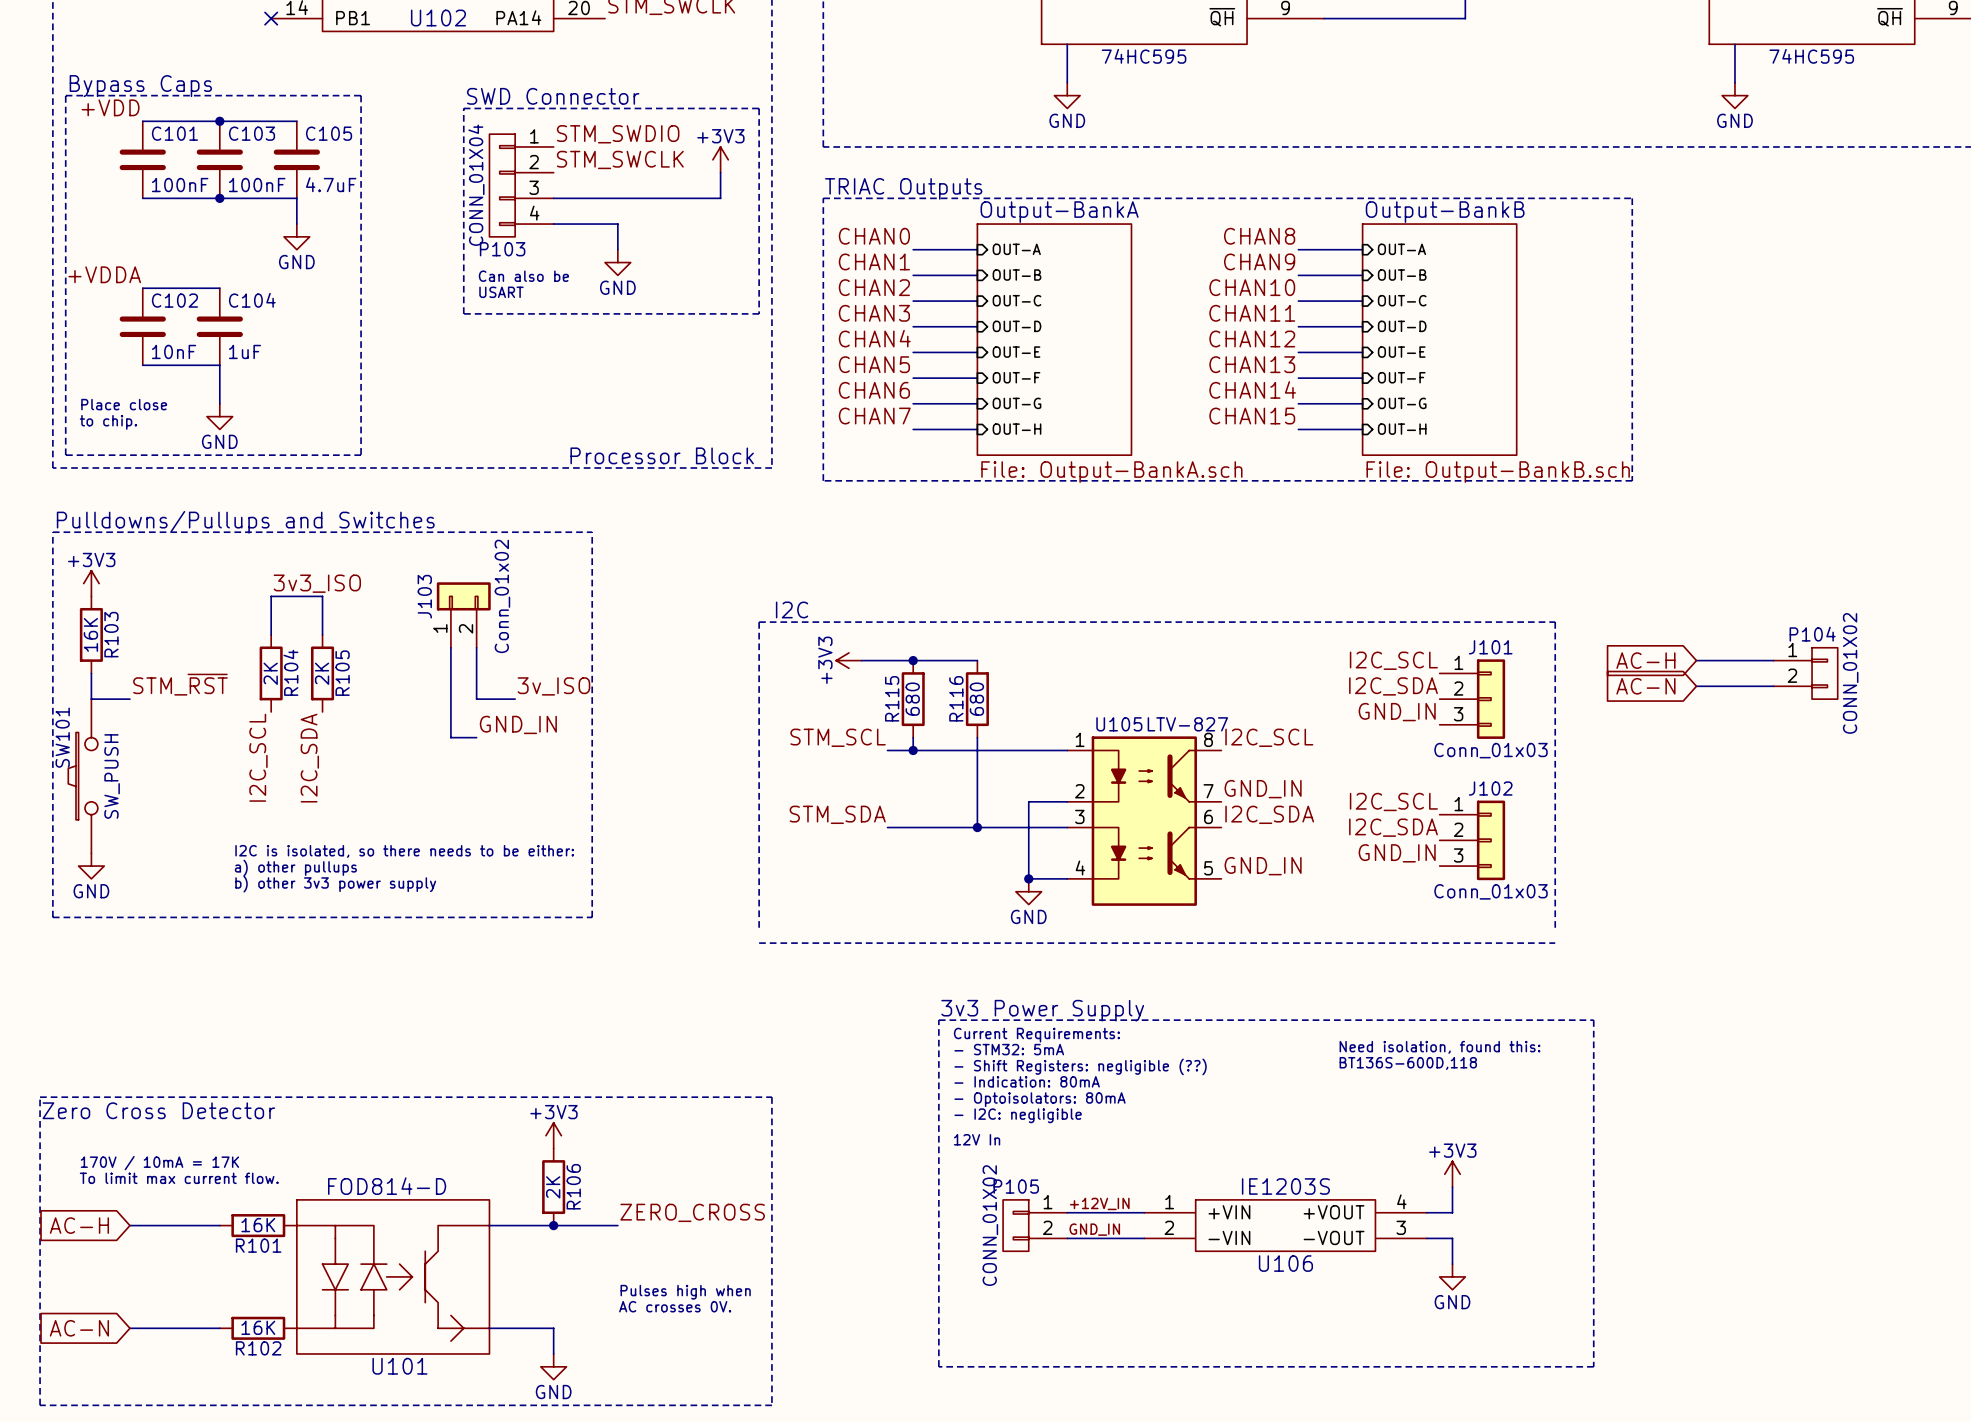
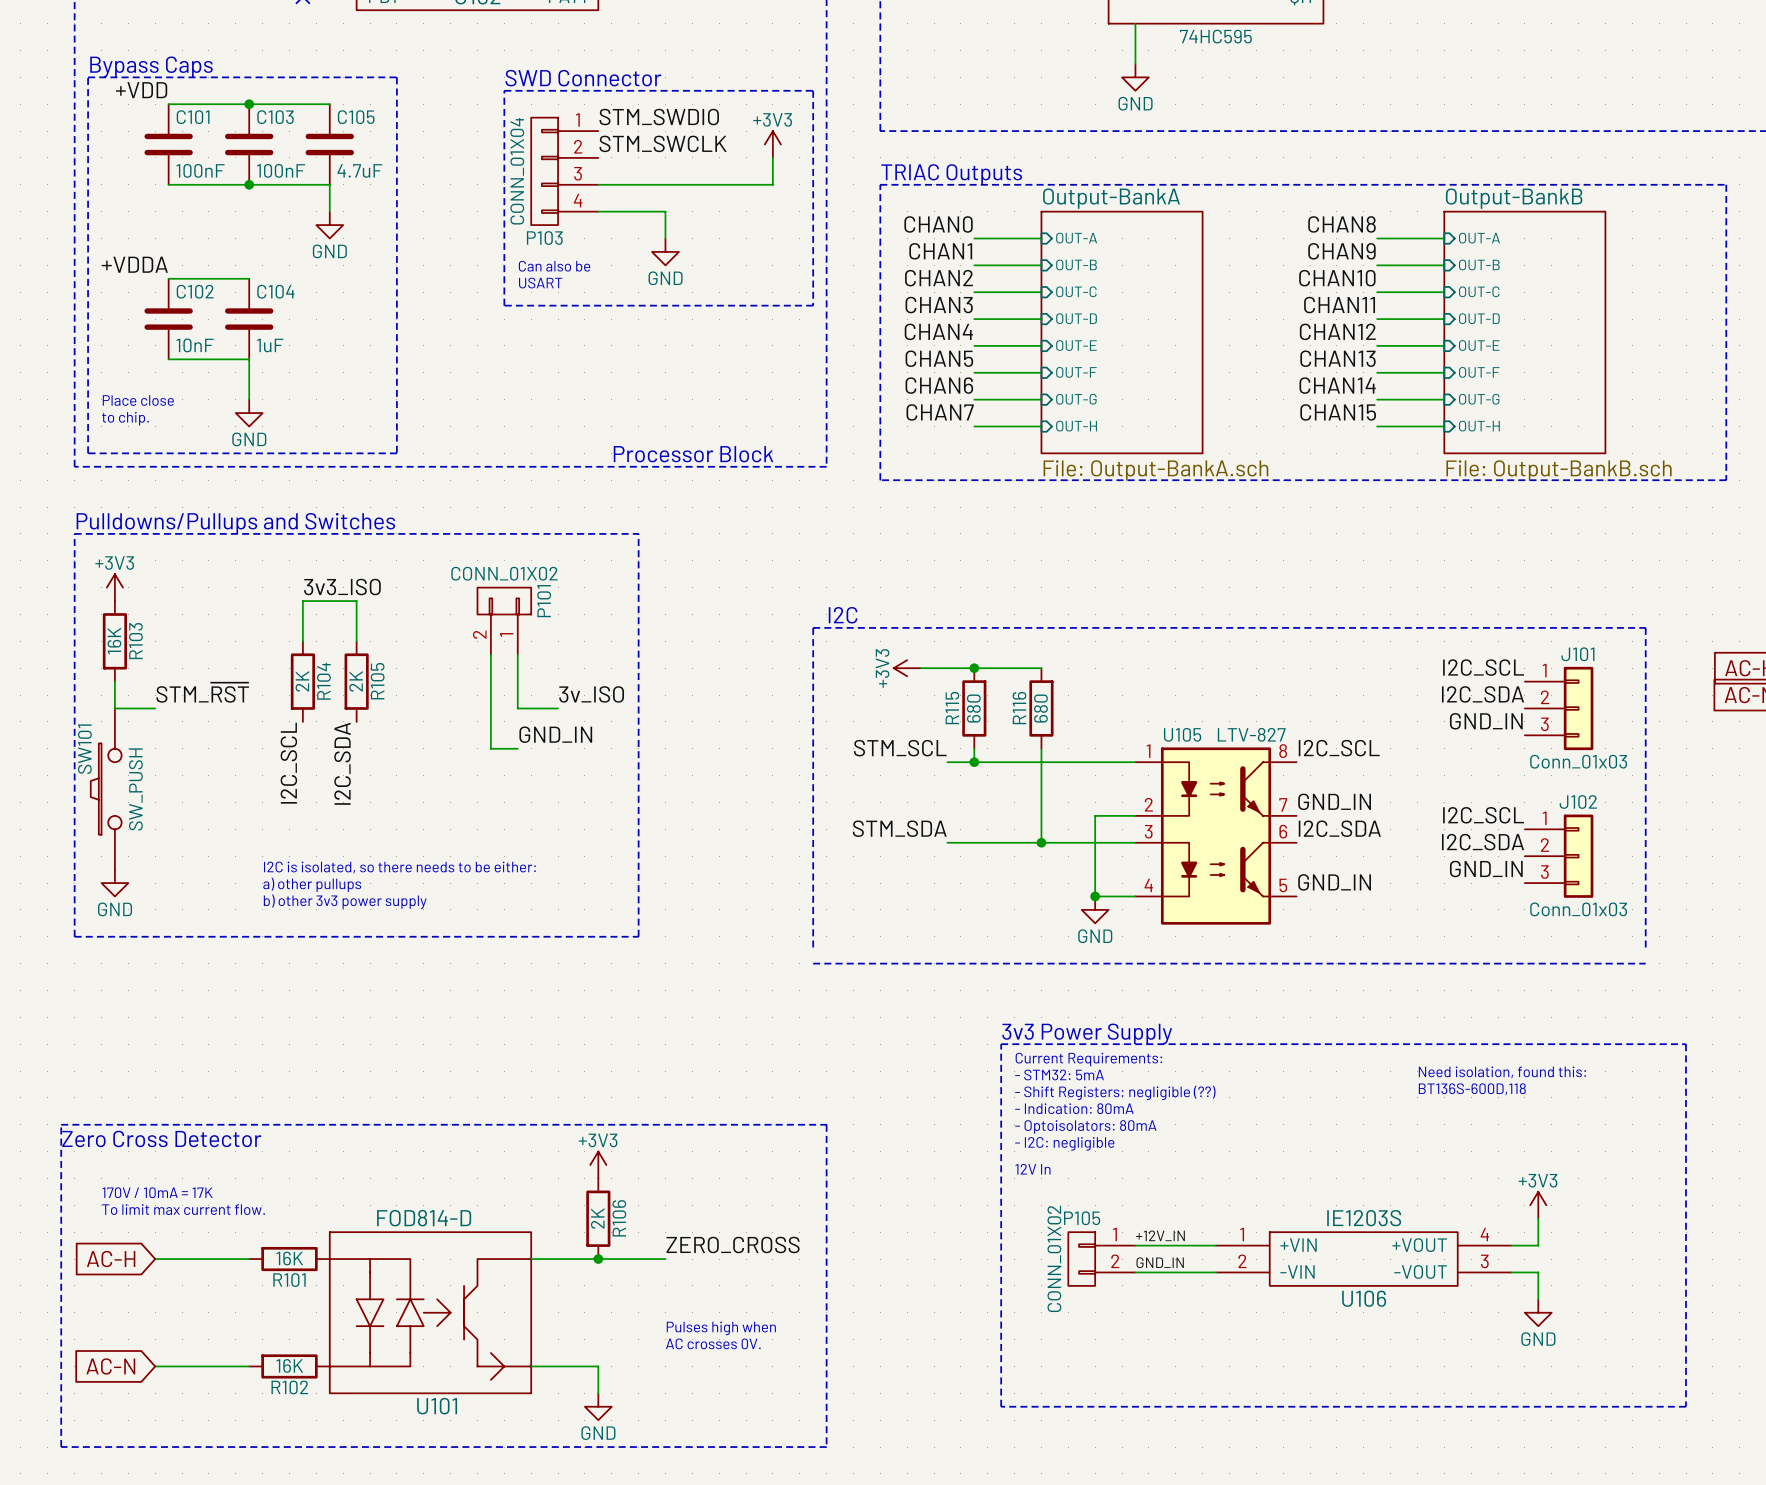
J103: Conn_01x02 (463, 615) -> none
P101: none -> CONN_01X02 (504, 621)

